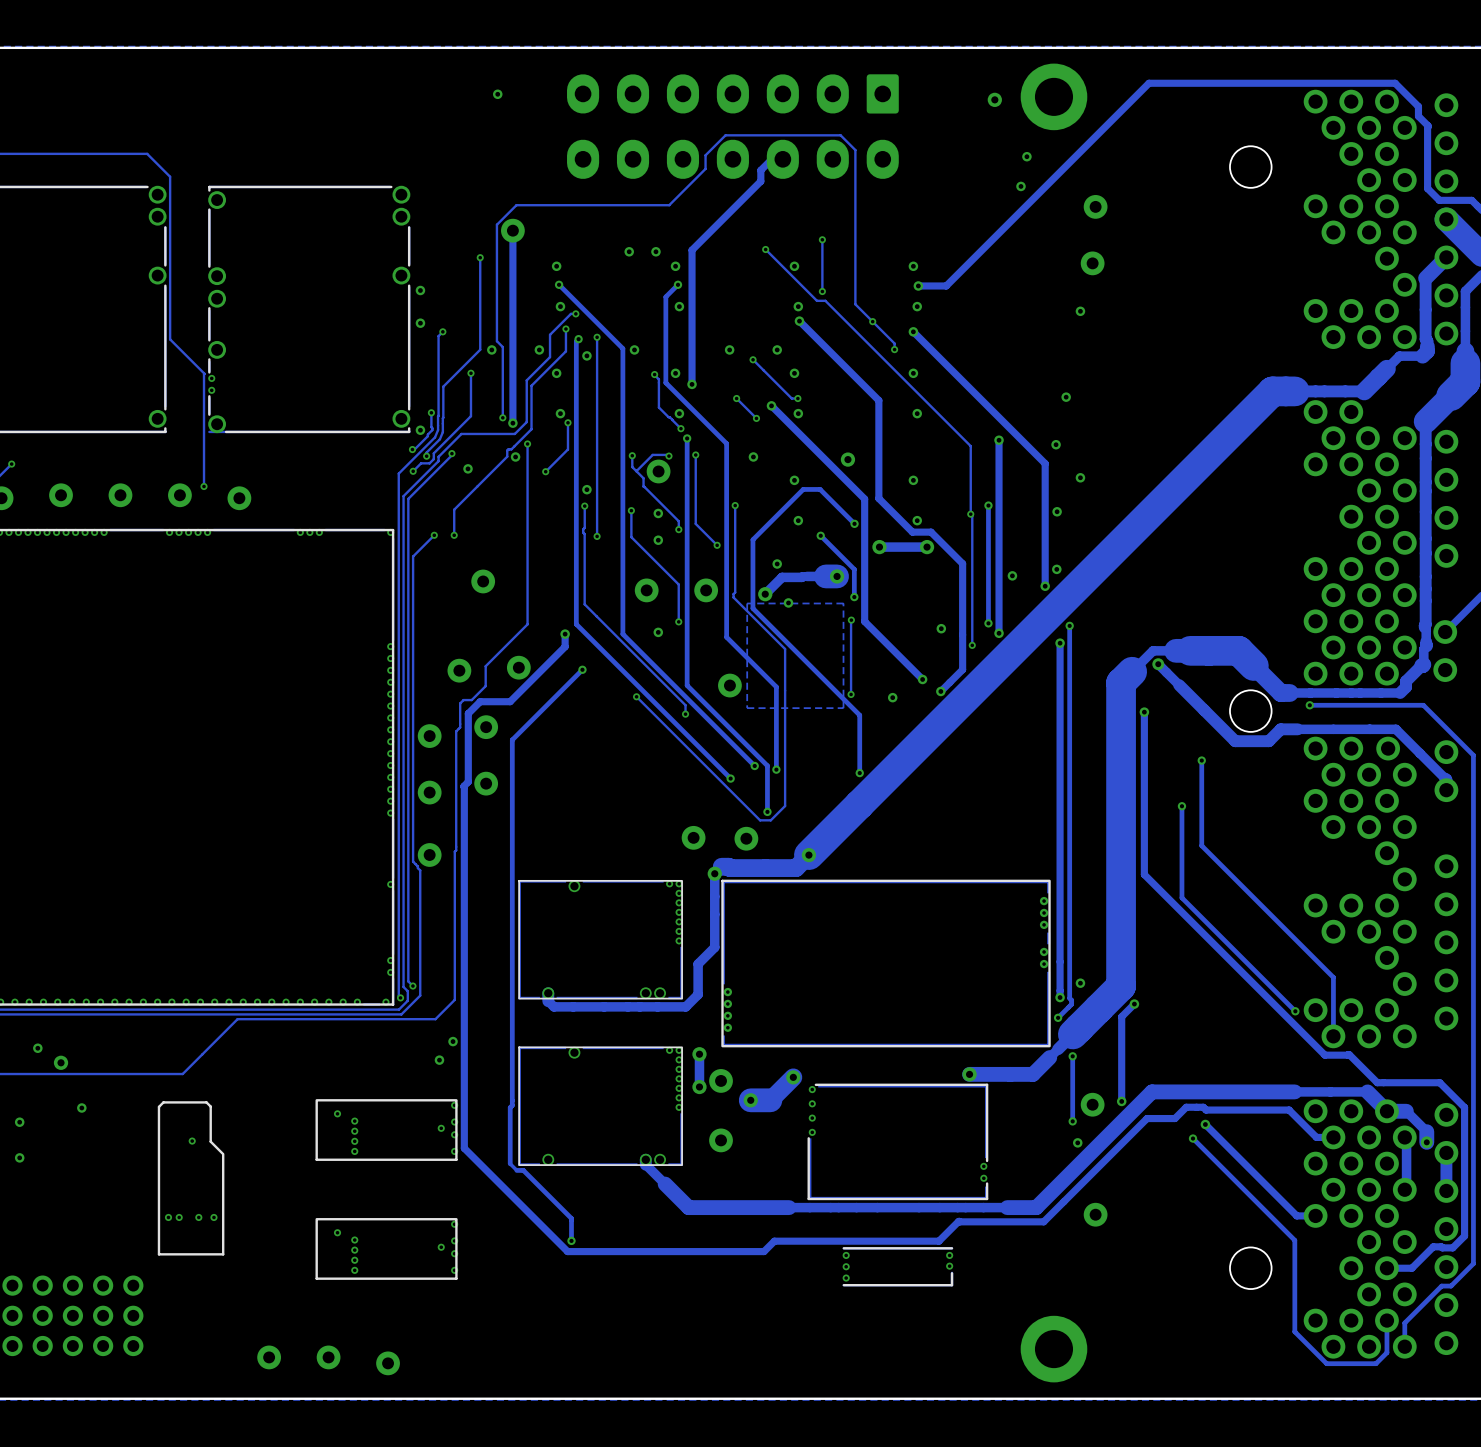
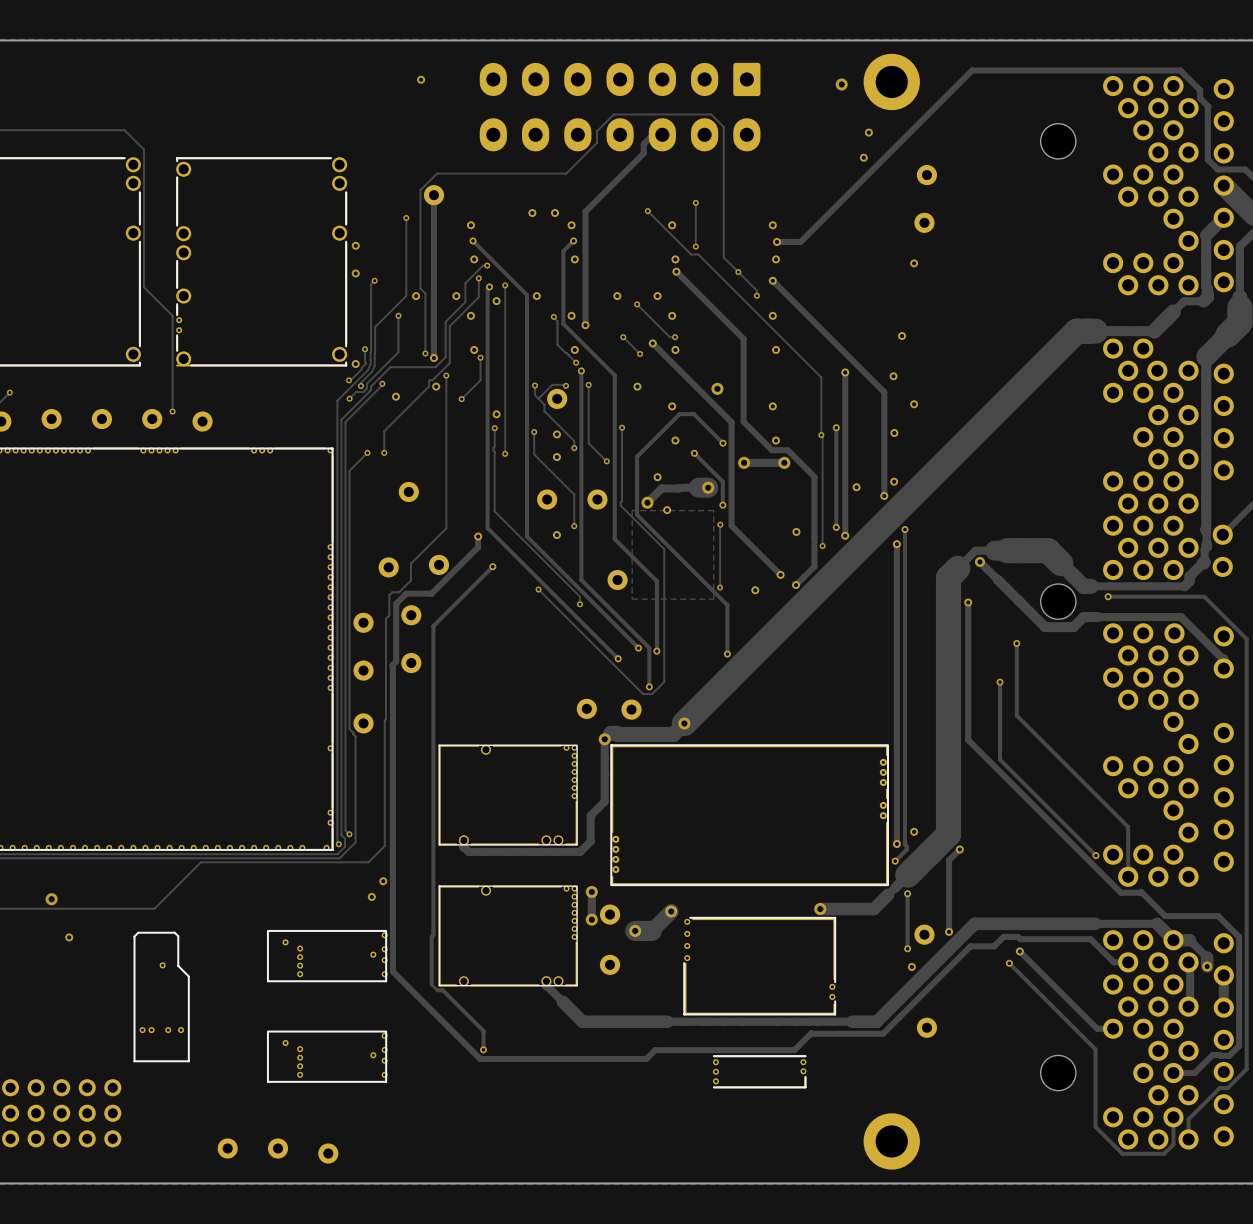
via: (37, 1048) -> none
via: (19, 1122) -> none
via: (19, 1157) -> none

